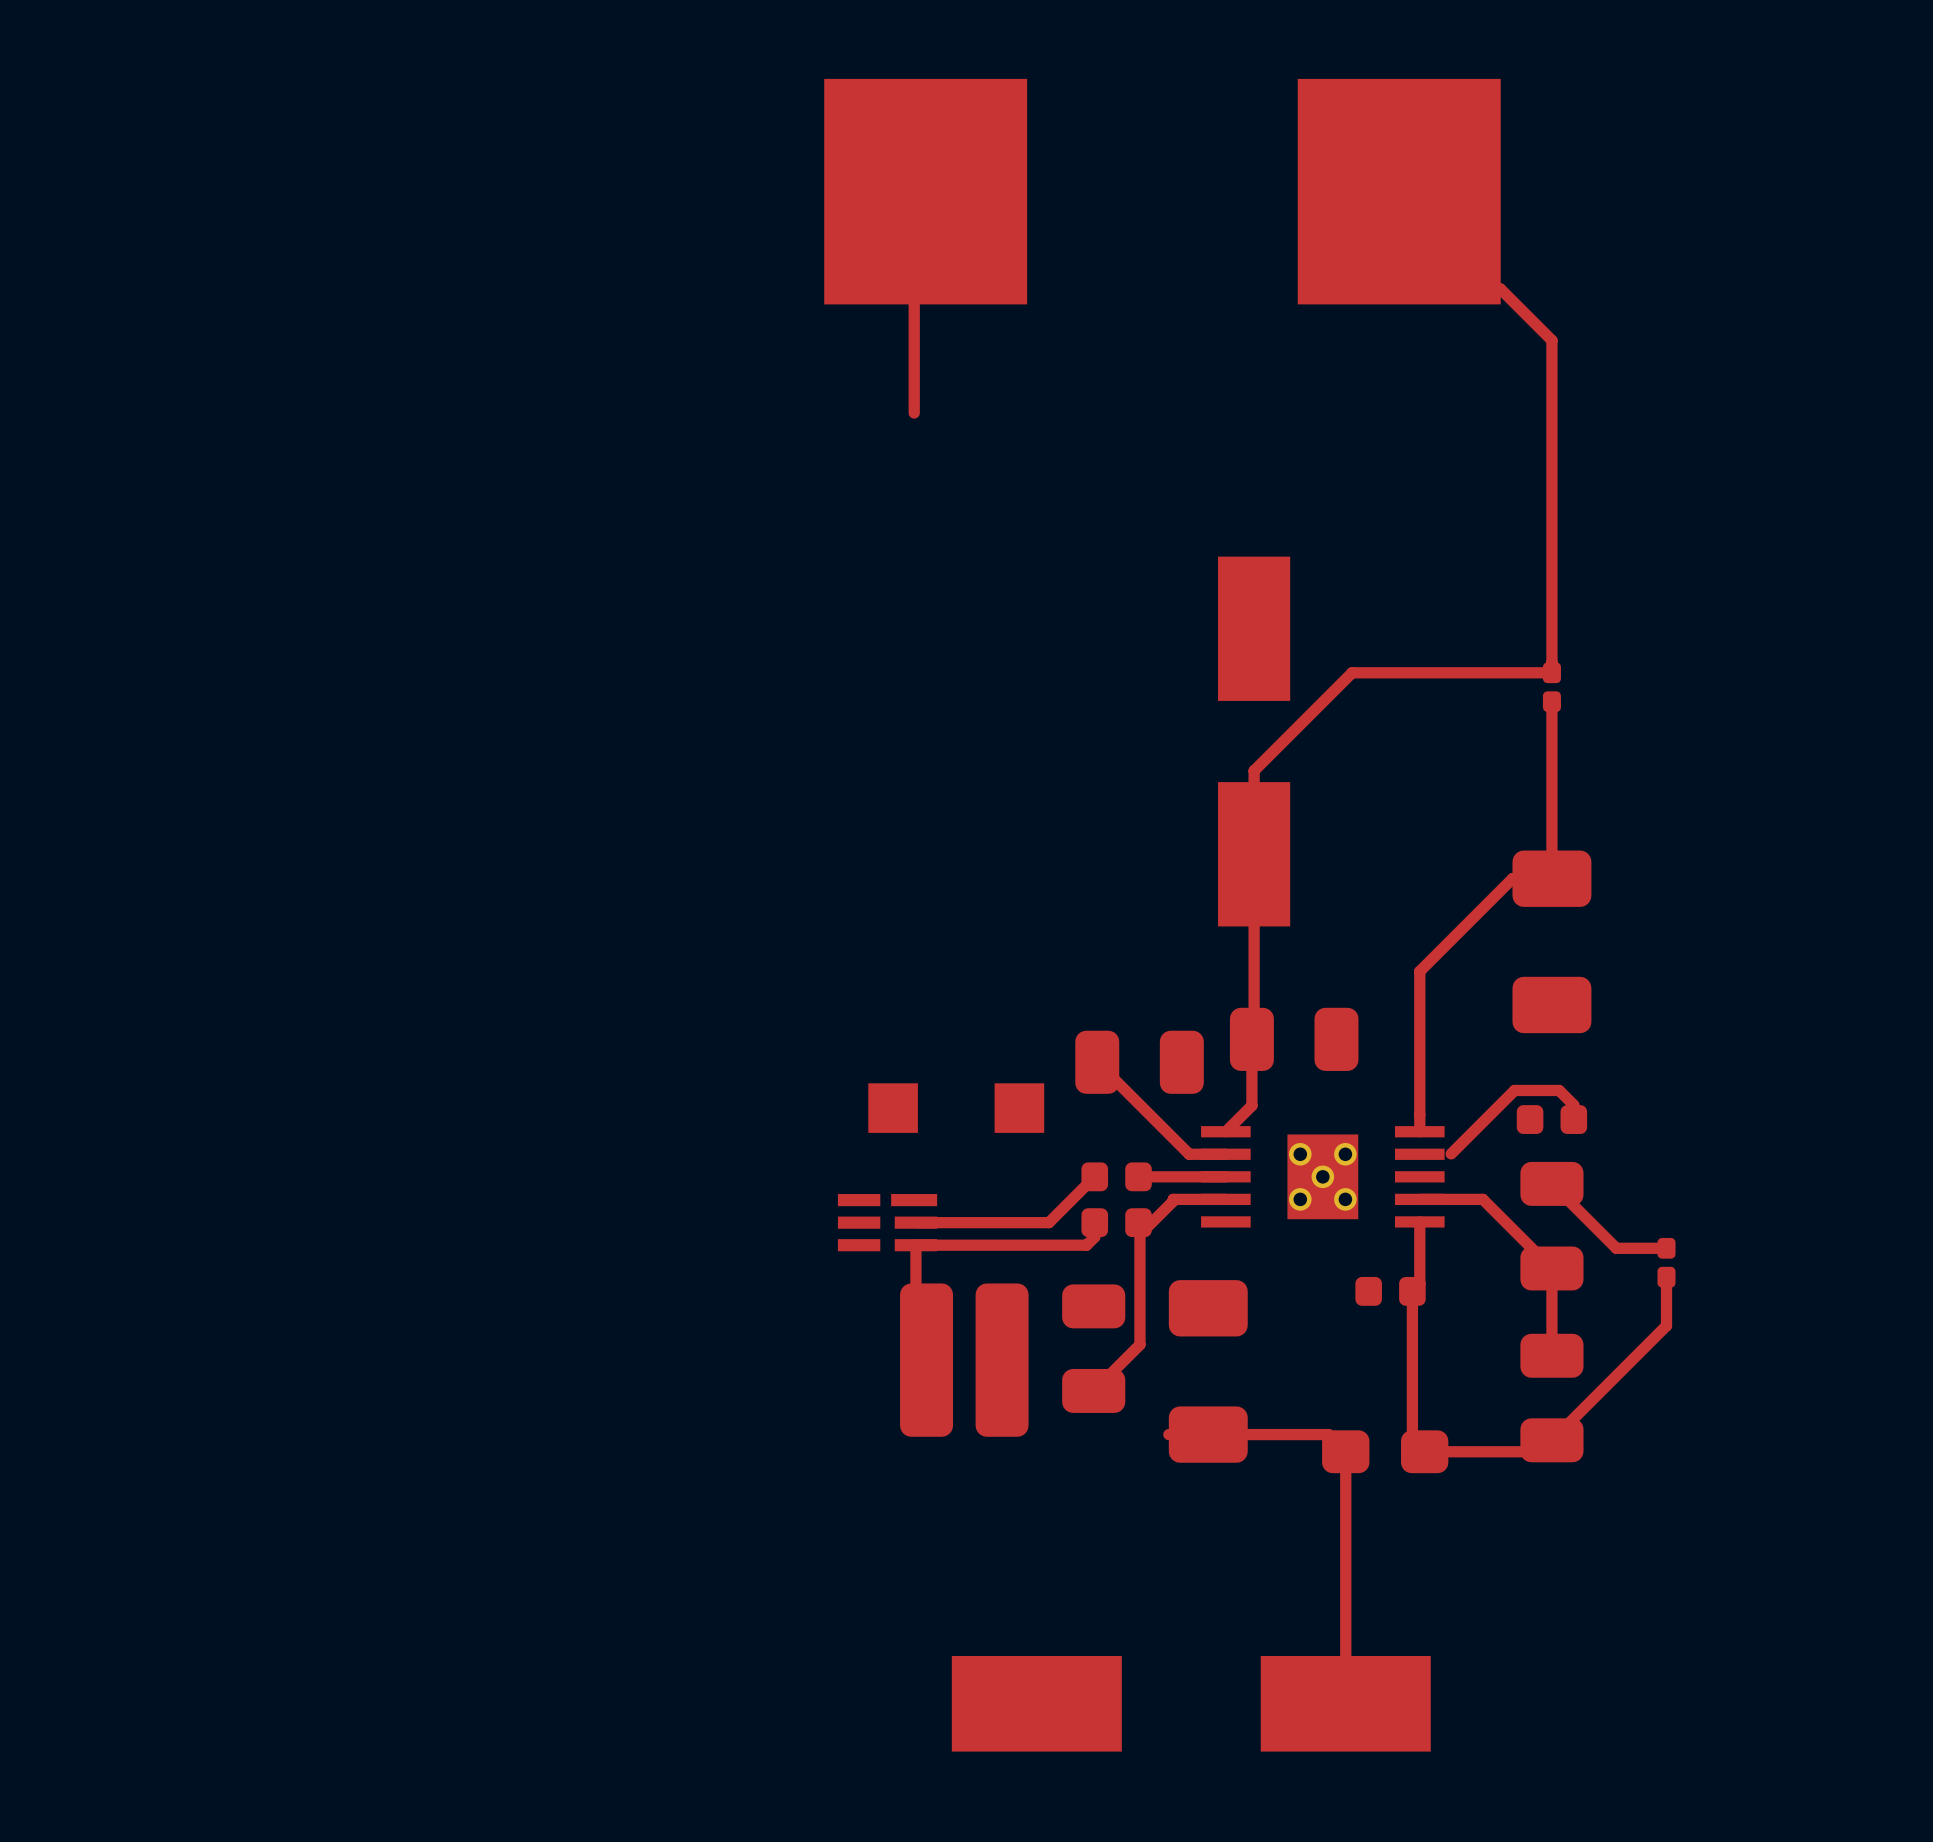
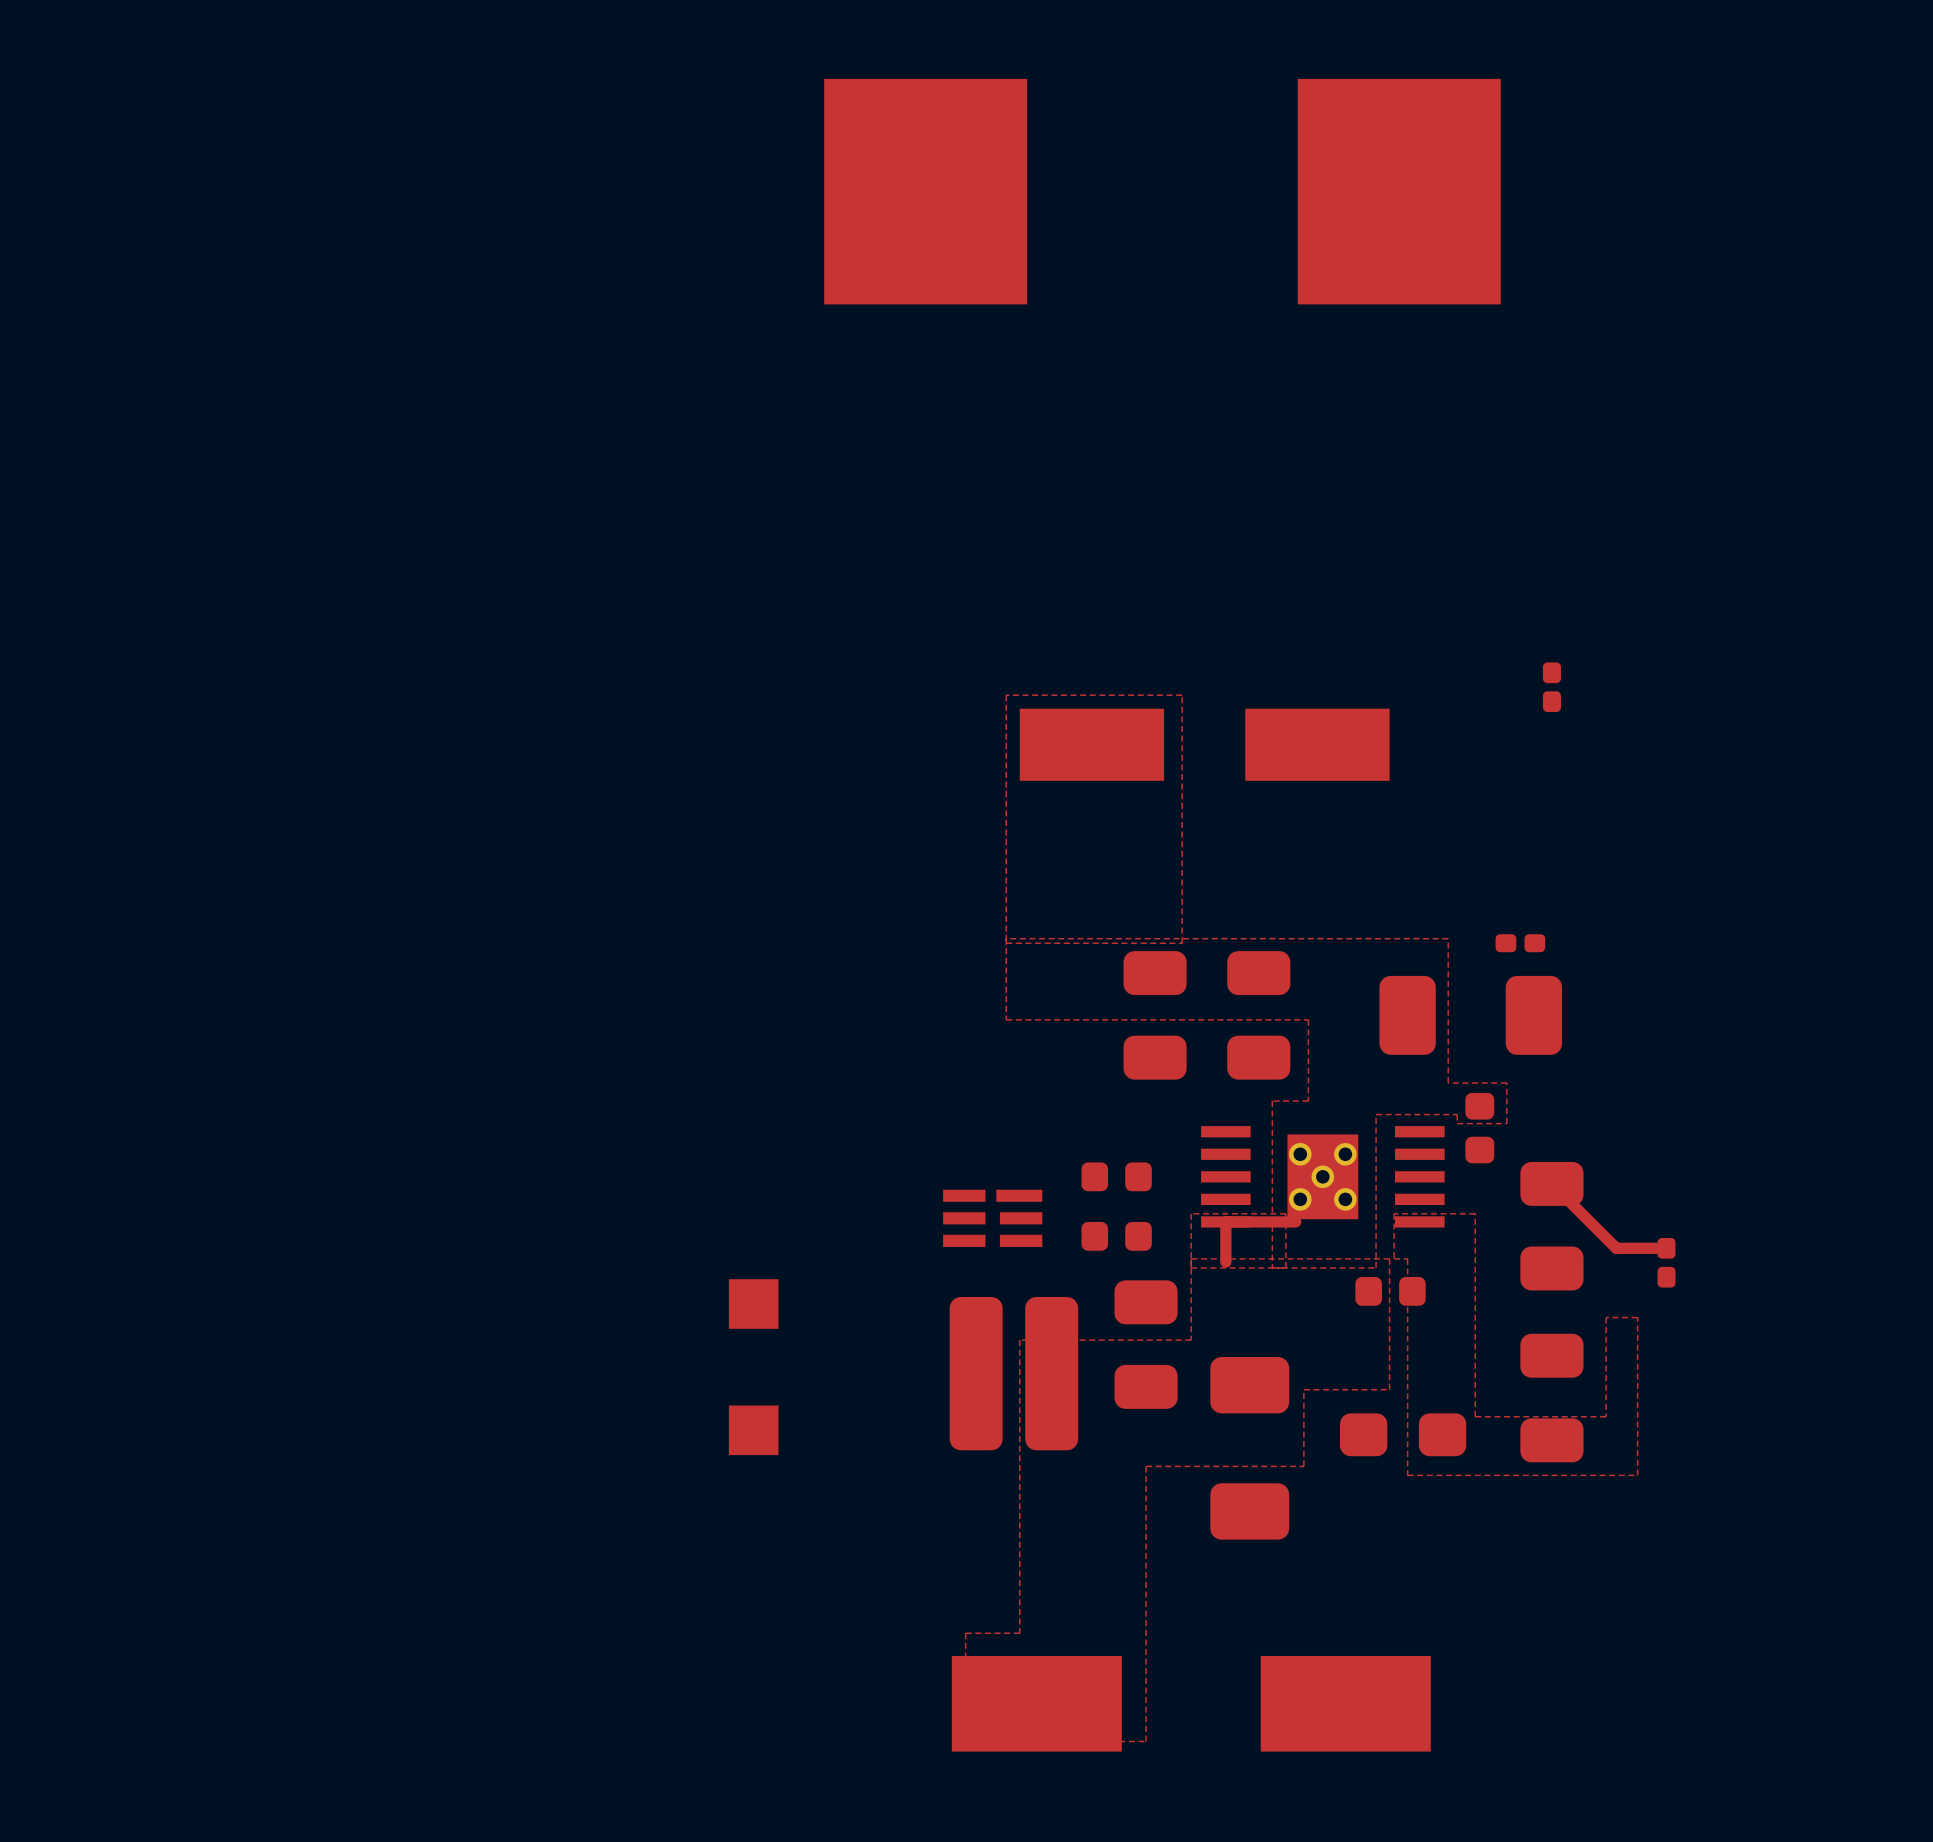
top track: (914, 289) (914, 413) -> none
top track: (1387, 289) (1500, 289) (1551, 340) (1551, 672) (1352, 672) (1254, 770) (1254, 1037) (1251, 1039) (1251, 1105) (1225, 1131) -> none
top track: (1551, 701) (1551, 878) (1512, 878) (1419, 971) (1419, 1131) -> none
part rotation: 0° (1254, 741) -> 90° clockwise (1204, 744)
part footprint: [1512, 850, 1592, 1034] -> [1495, 934, 1546, 953]
top zone outline: none -> (1006, 938) (1448, 938) (1448, 1083) (1506, 1083) (1506, 1123) (1457, 1123) (1457, 1114) (1376, 1114) (1376, 1267) (1191, 1267)
top zone outline: none -> (1006, 943) (1182, 943) (1182, 695) (1006, 695) (1006, 1019) (1308, 1019) (1308, 1101) (1272, 1101) (1272, 1267)
part: none -> (1470, 1015)
part rotation: 0° (1294, 1039) -> 90° clockwise (1258, 1015)
top track: (1097, 1062) (1189, 1154) (1225, 1154) -> none
part rotation: 0° (1139, 1062) -> 90° clockwise (1155, 1015)
part rotation: 0° (956, 1108) -> 90° clockwise (753, 1367)
part position: (956, 1108) -> (753, 1367)
part rotation: 0° (1551, 1119) -> 90° clockwise (1479, 1128)
part position: (1551, 1119) -> (1479, 1128)
top track: (1573, 1119) (1573, 1105) (1559, 1090) (1514, 1090) (1451, 1153) -> none
top track: (1094, 1176) (1048, 1222) (915, 1222) -> none
top track: (1225, 1176) (1138, 1176) -> none
top track: (1225, 1199) (1173, 1199) (1139, 1234) (1139, 1344) (1093, 1390) -> none
top track: (1419, 1199) (1482, 1199) (1551, 1268) (1551, 1355) -> none
top zone outline: none -> (1475, 1213) (1475, 1416) (1606, 1416) (1606, 1317) (1637, 1317) (1637, 1475) (1407, 1475) (1407, 1258) (1394, 1258) (1394, 1213) (1475, 1213)
top track: none -> (1295, 1221) (1225, 1221) (1225, 1262)
top track: (1419, 1221) (1419, 1283) (1412, 1291) (1412, 1439) (1424, 1451) -> none
part position: (887, 1222) -> (992, 1218)
top track: (1094, 1222) (1094, 1237) (1086, 1245) (915, 1245) (915, 1349) (926, 1360) -> none
part position: (1116, 1222) -> (1116, 1236)
top zone outline: none -> (1191, 1258) (1389, 1258) (1389, 1389) (1303, 1389) (1303, 1466) (1146, 1466) (1146, 1741) (965, 1741) (965, 1633) (1019, 1633) (1019, 1340) (1191, 1340) (1191, 1213) (1285, 1213) (1285, 1267)
top track: (1666, 1277) (1666, 1325) (1540, 1451) (1424, 1451) -> none
part position: (1093, 1348) -> (1146, 1344)
part position: (964, 1360) -> (1013, 1373)
part position: (1208, 1371) -> (1249, 1448)
top track: (1168, 1434) (1328, 1434) (1345, 1451) (1345, 1703) -> none
part position: (1385, 1451) -> (1403, 1434)

